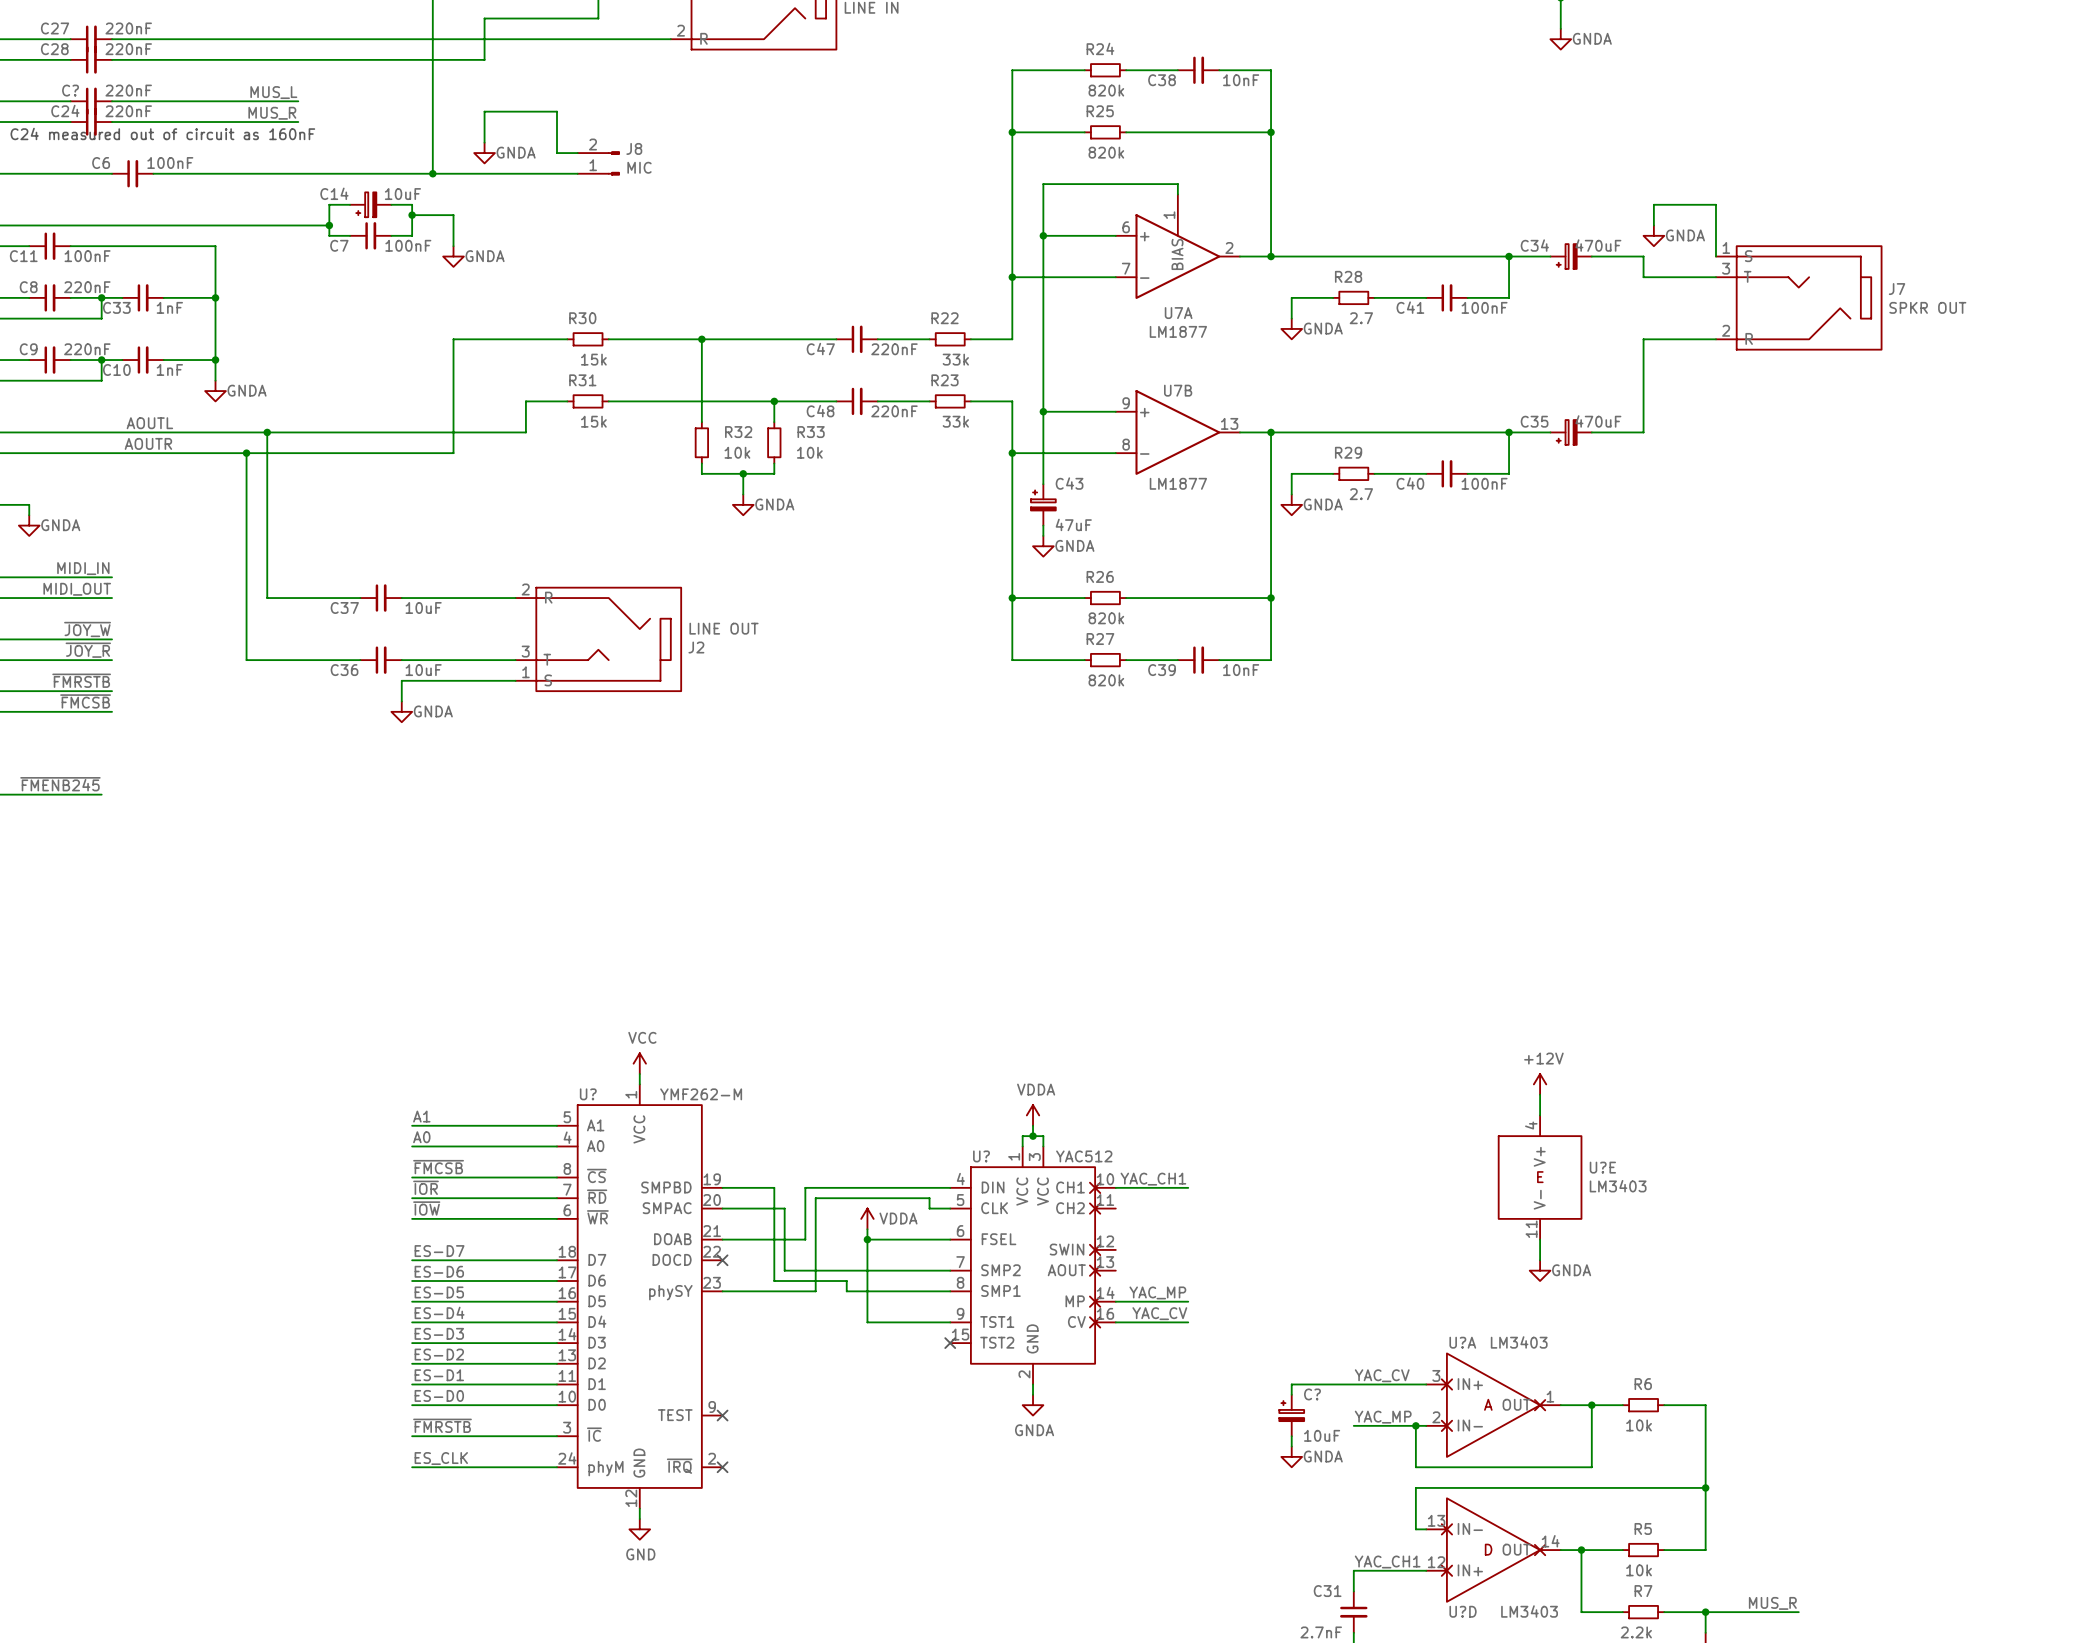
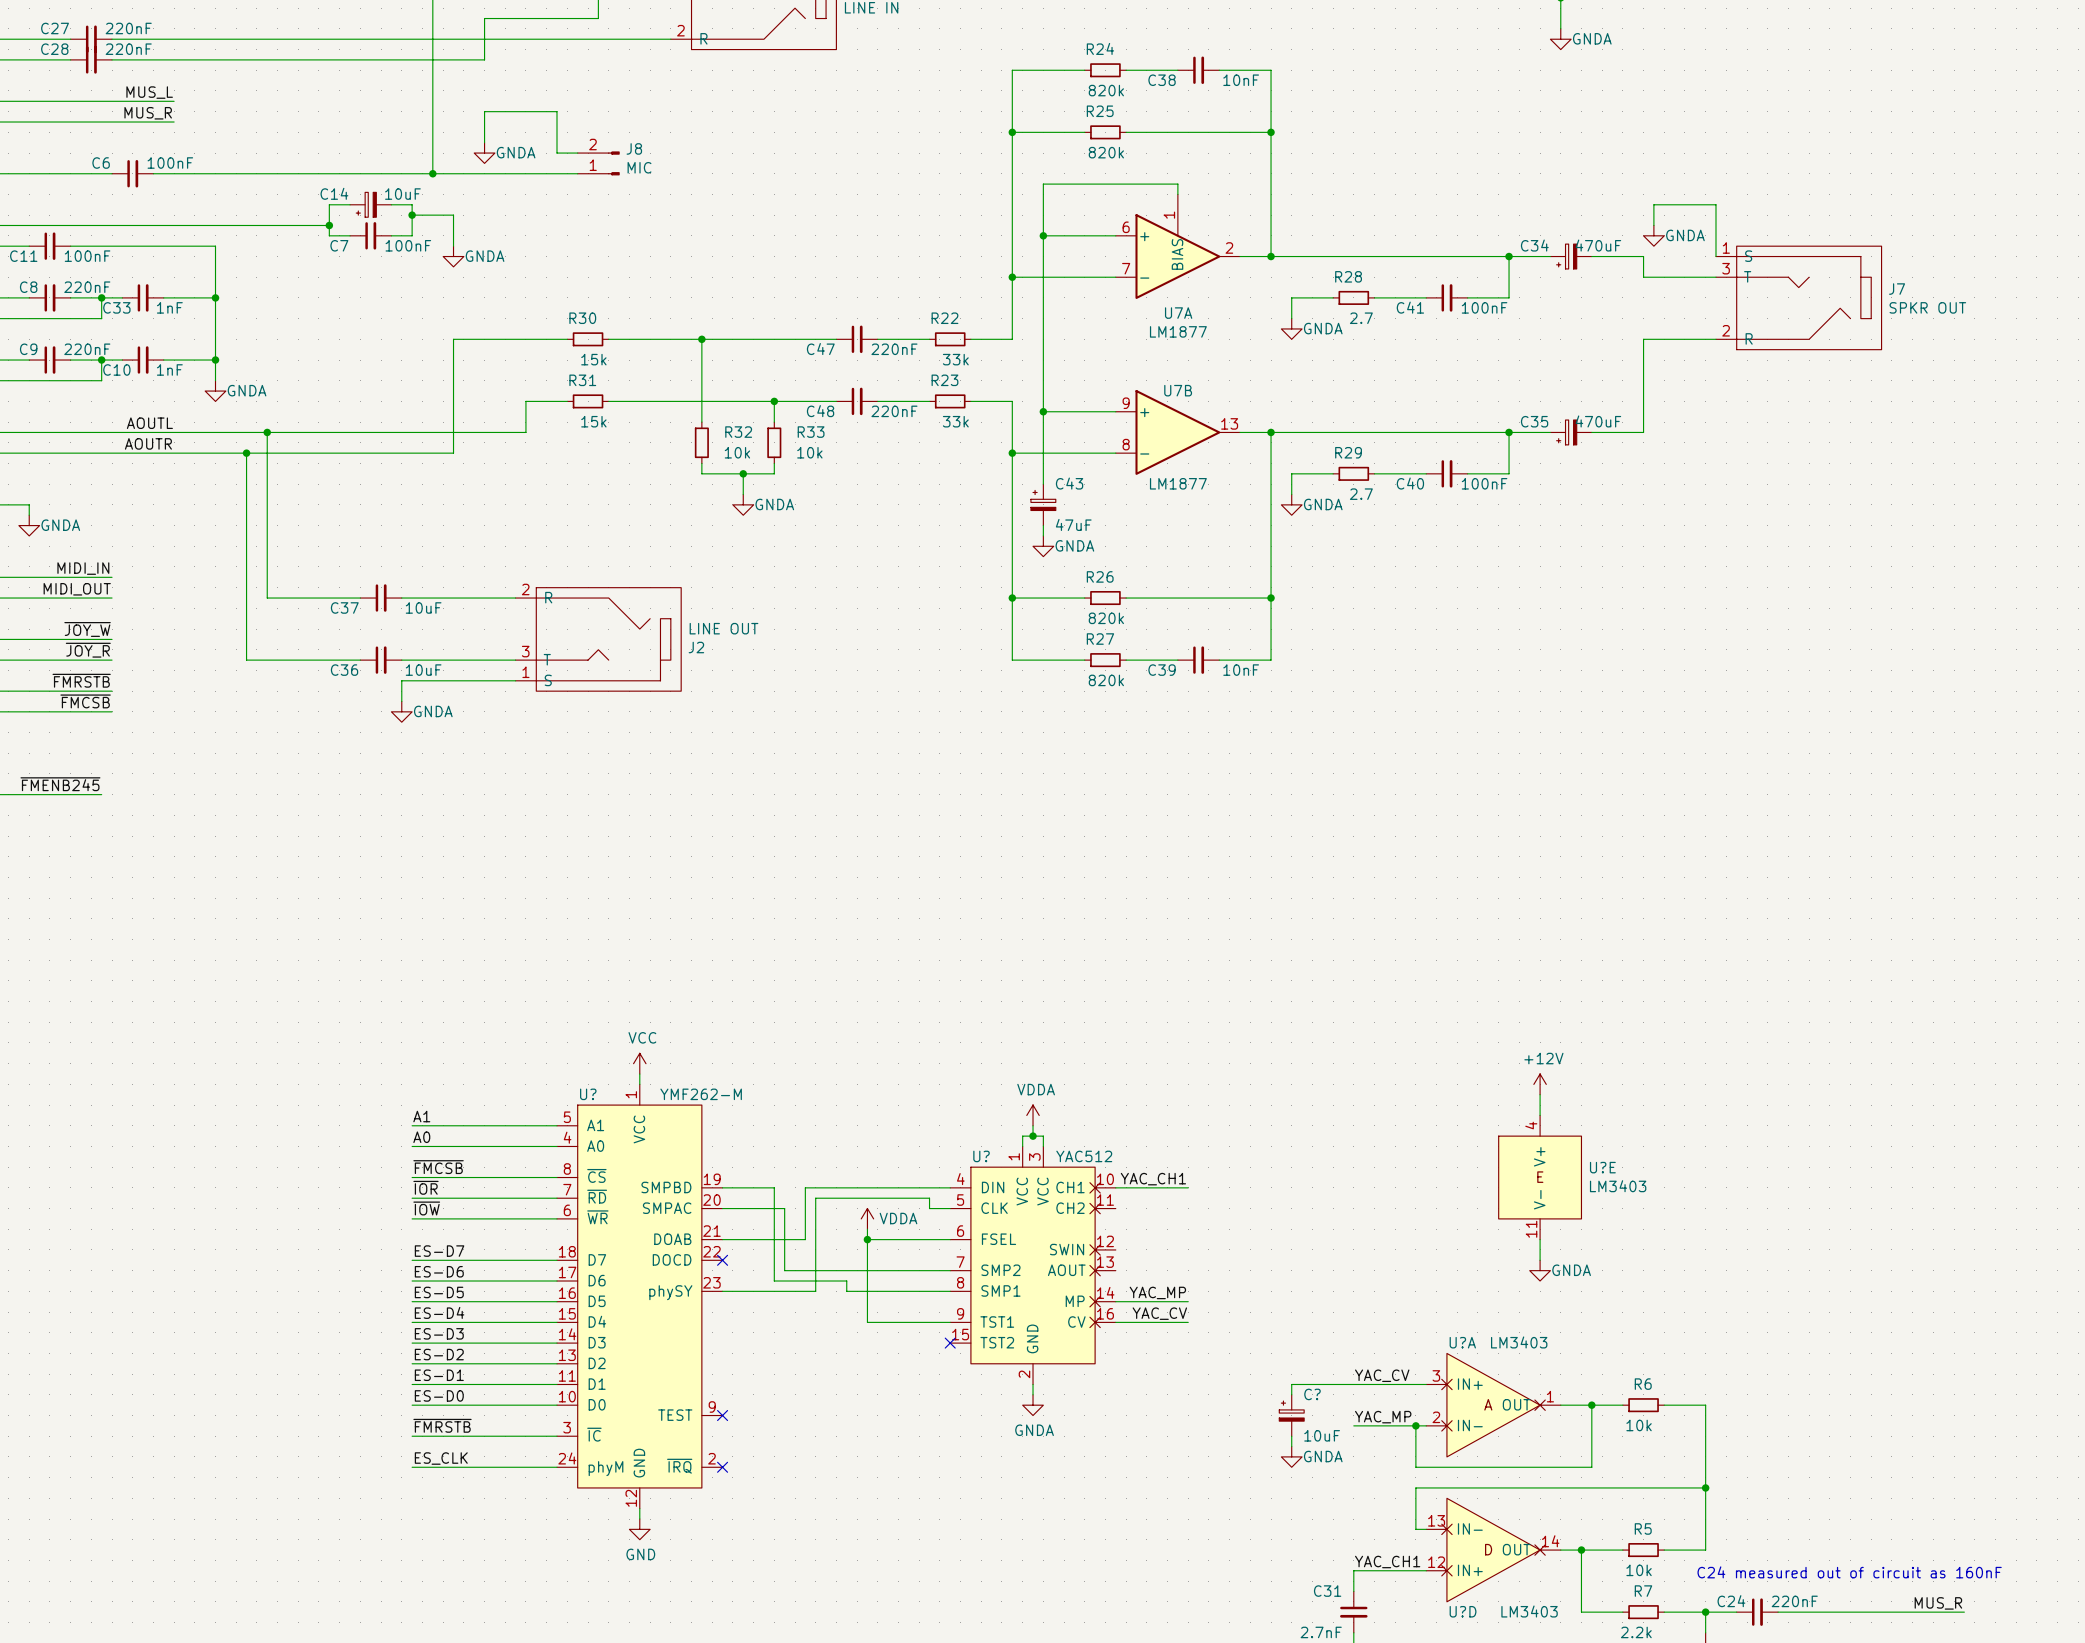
label position: MUS_L (273, 92) -> MUS_L (149, 92)
C?: 220nF (91, 101) -> none
wire: (174, 101) (298, 101) -> none
label position: MUS_R (272, 113) -> MUS_R (148, 113)
C24 position: (91, 122) -> (1757, 1612)
wire: (174, 122) (298, 122) -> none
text: C24 measured out of circuit as 160nF (162, 133) -> none
text: none -> C24 measured out of circuit as 160nF (1849, 1572)
label position: MUS_R (1772, 1603) -> MUS_R (1938, 1603)
wire: none -> (1798, 1612) (1964, 1612)

